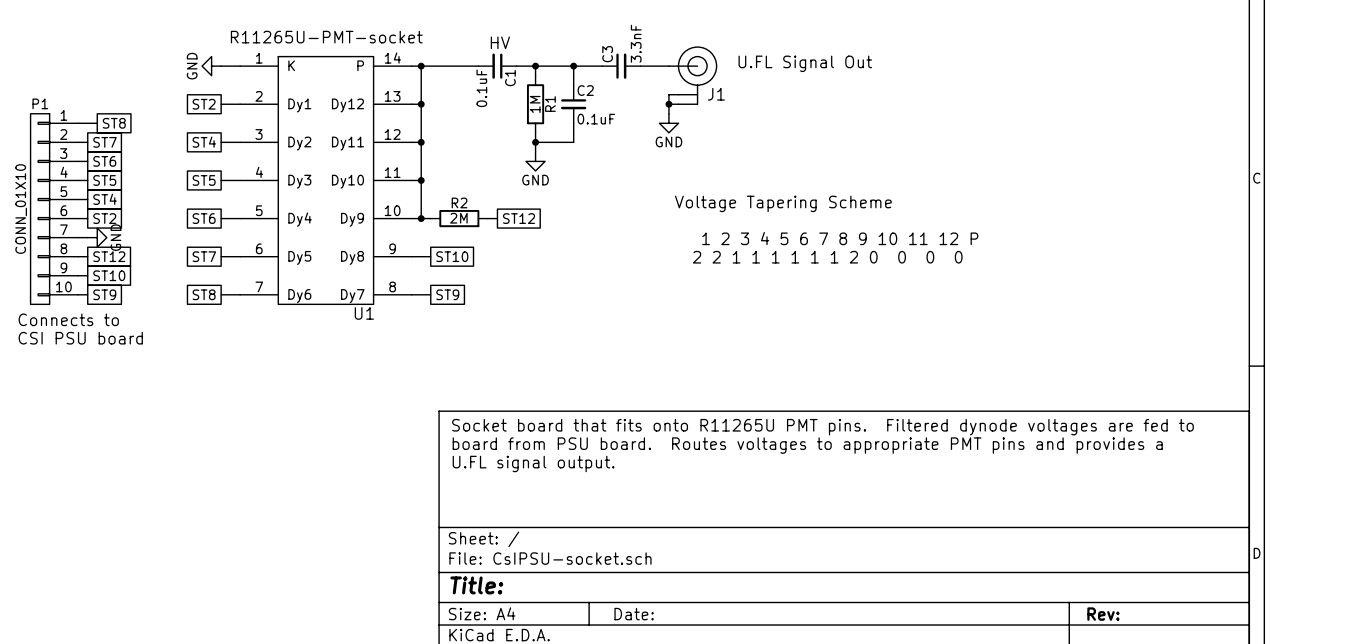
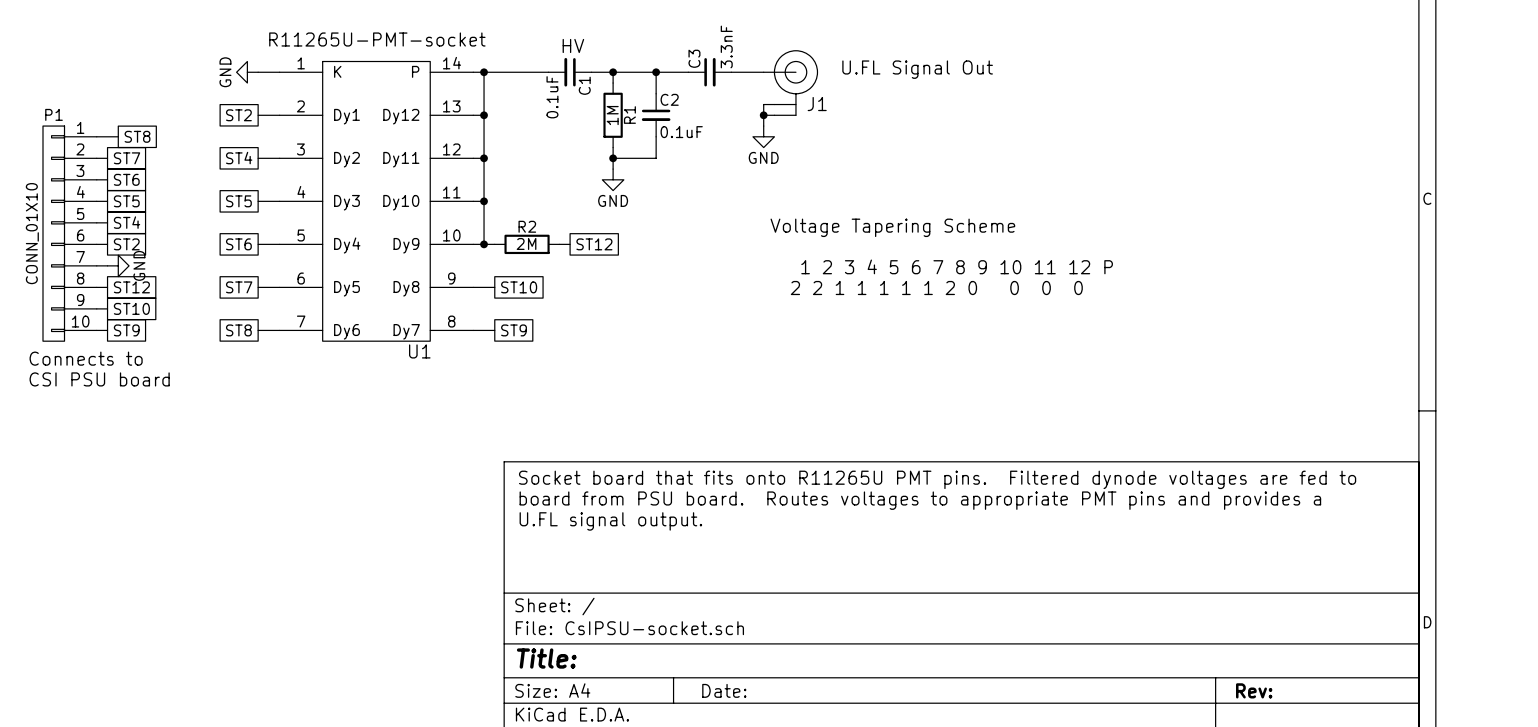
text: 2 2 1 1 1 1 1 1 2 0 0 0 0 (827, 257) -> 2 2 1 1 1 1 1 2 0 0 0 0 (936, 288)

